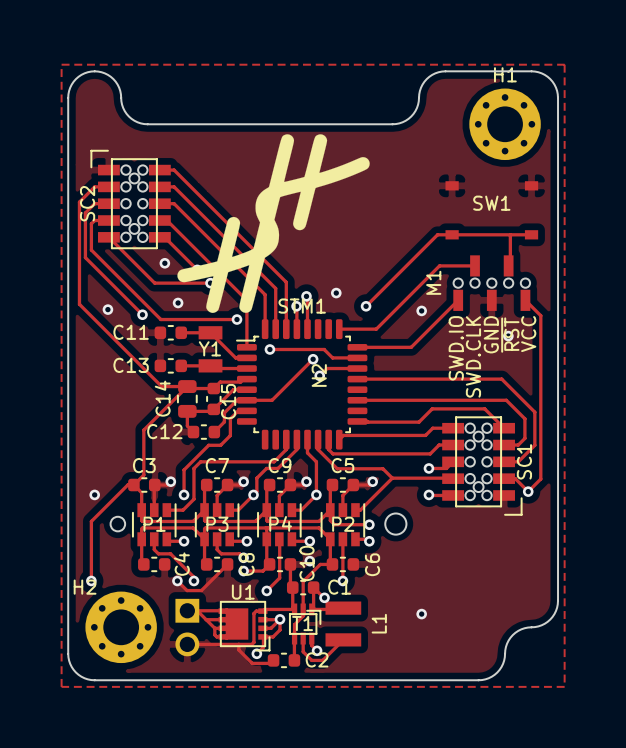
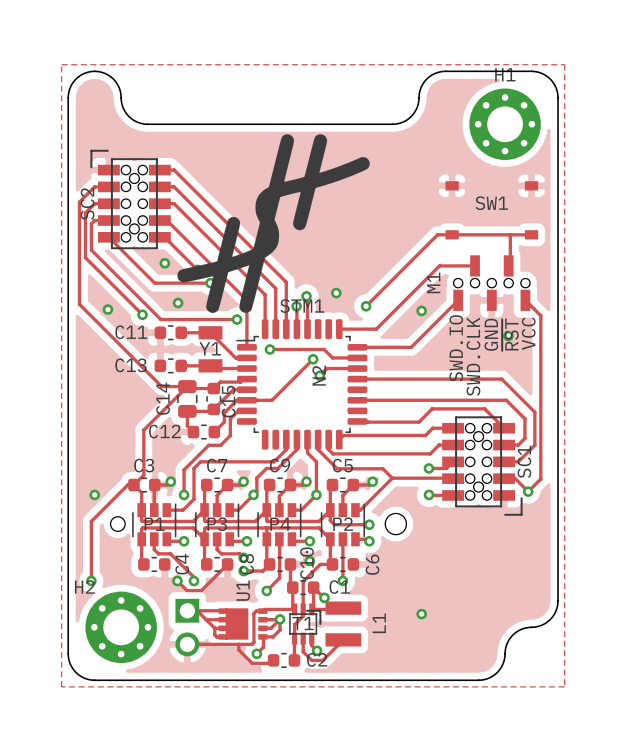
U1 footprint: [218, 601, 271, 652] -> [218, 608, 268, 640]

